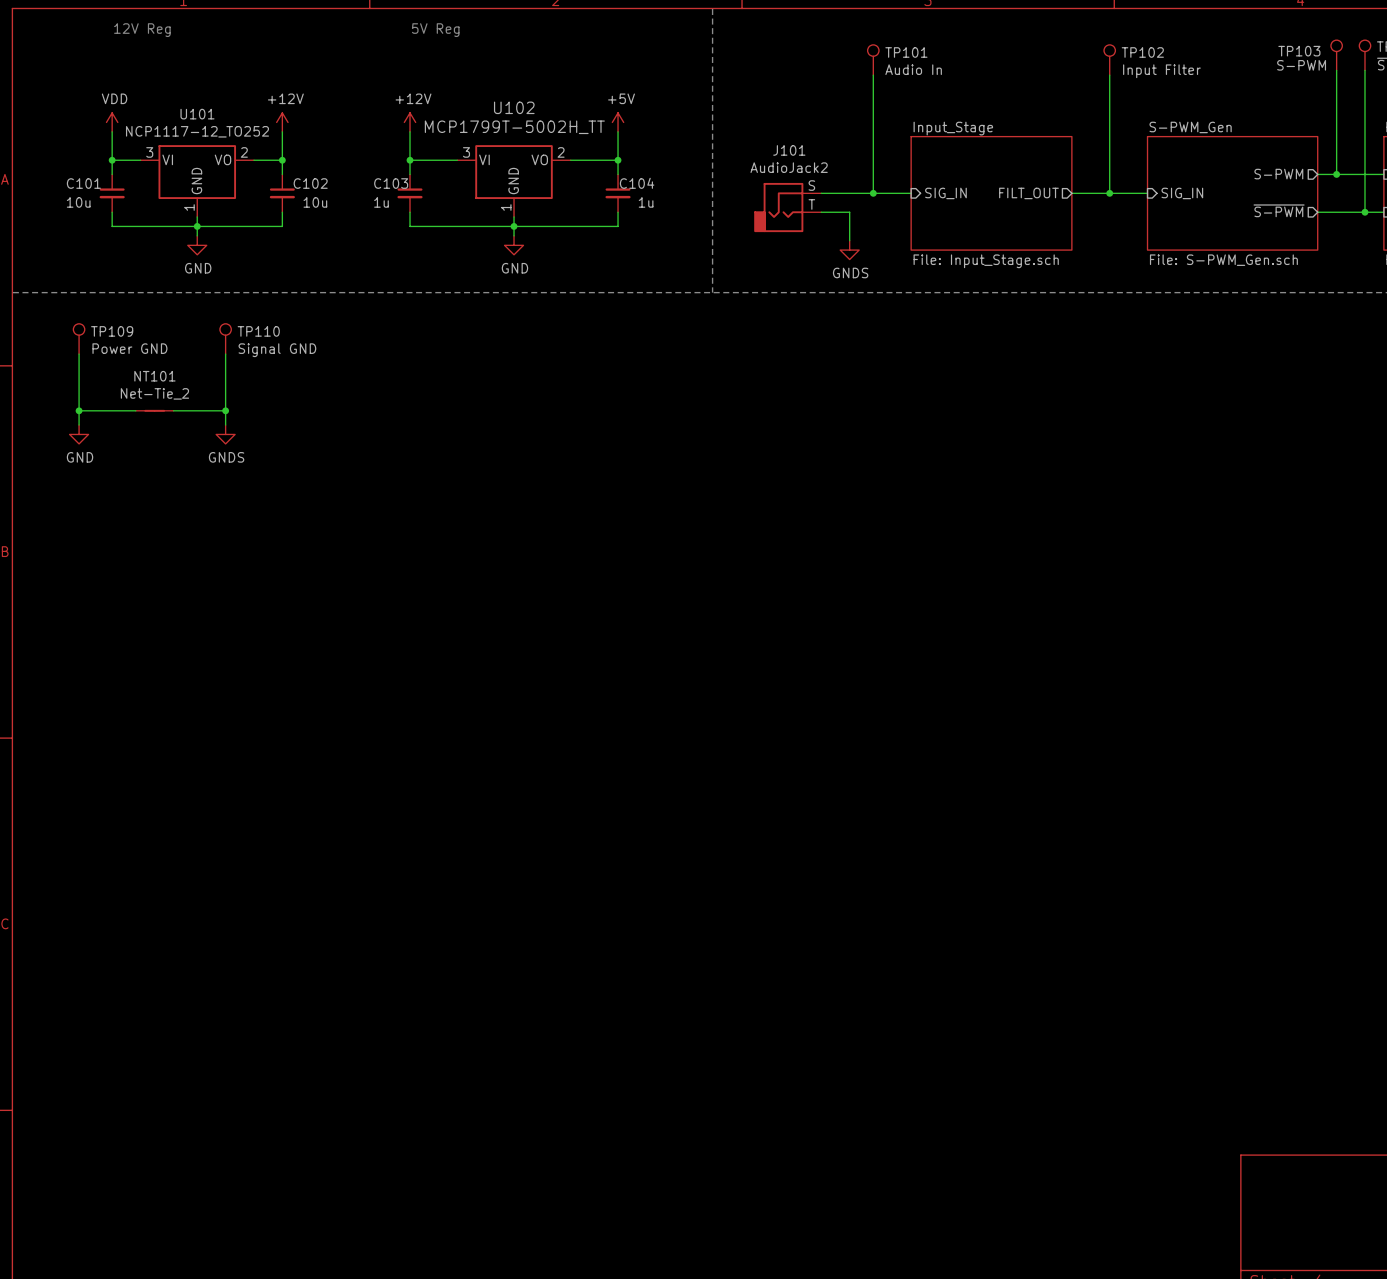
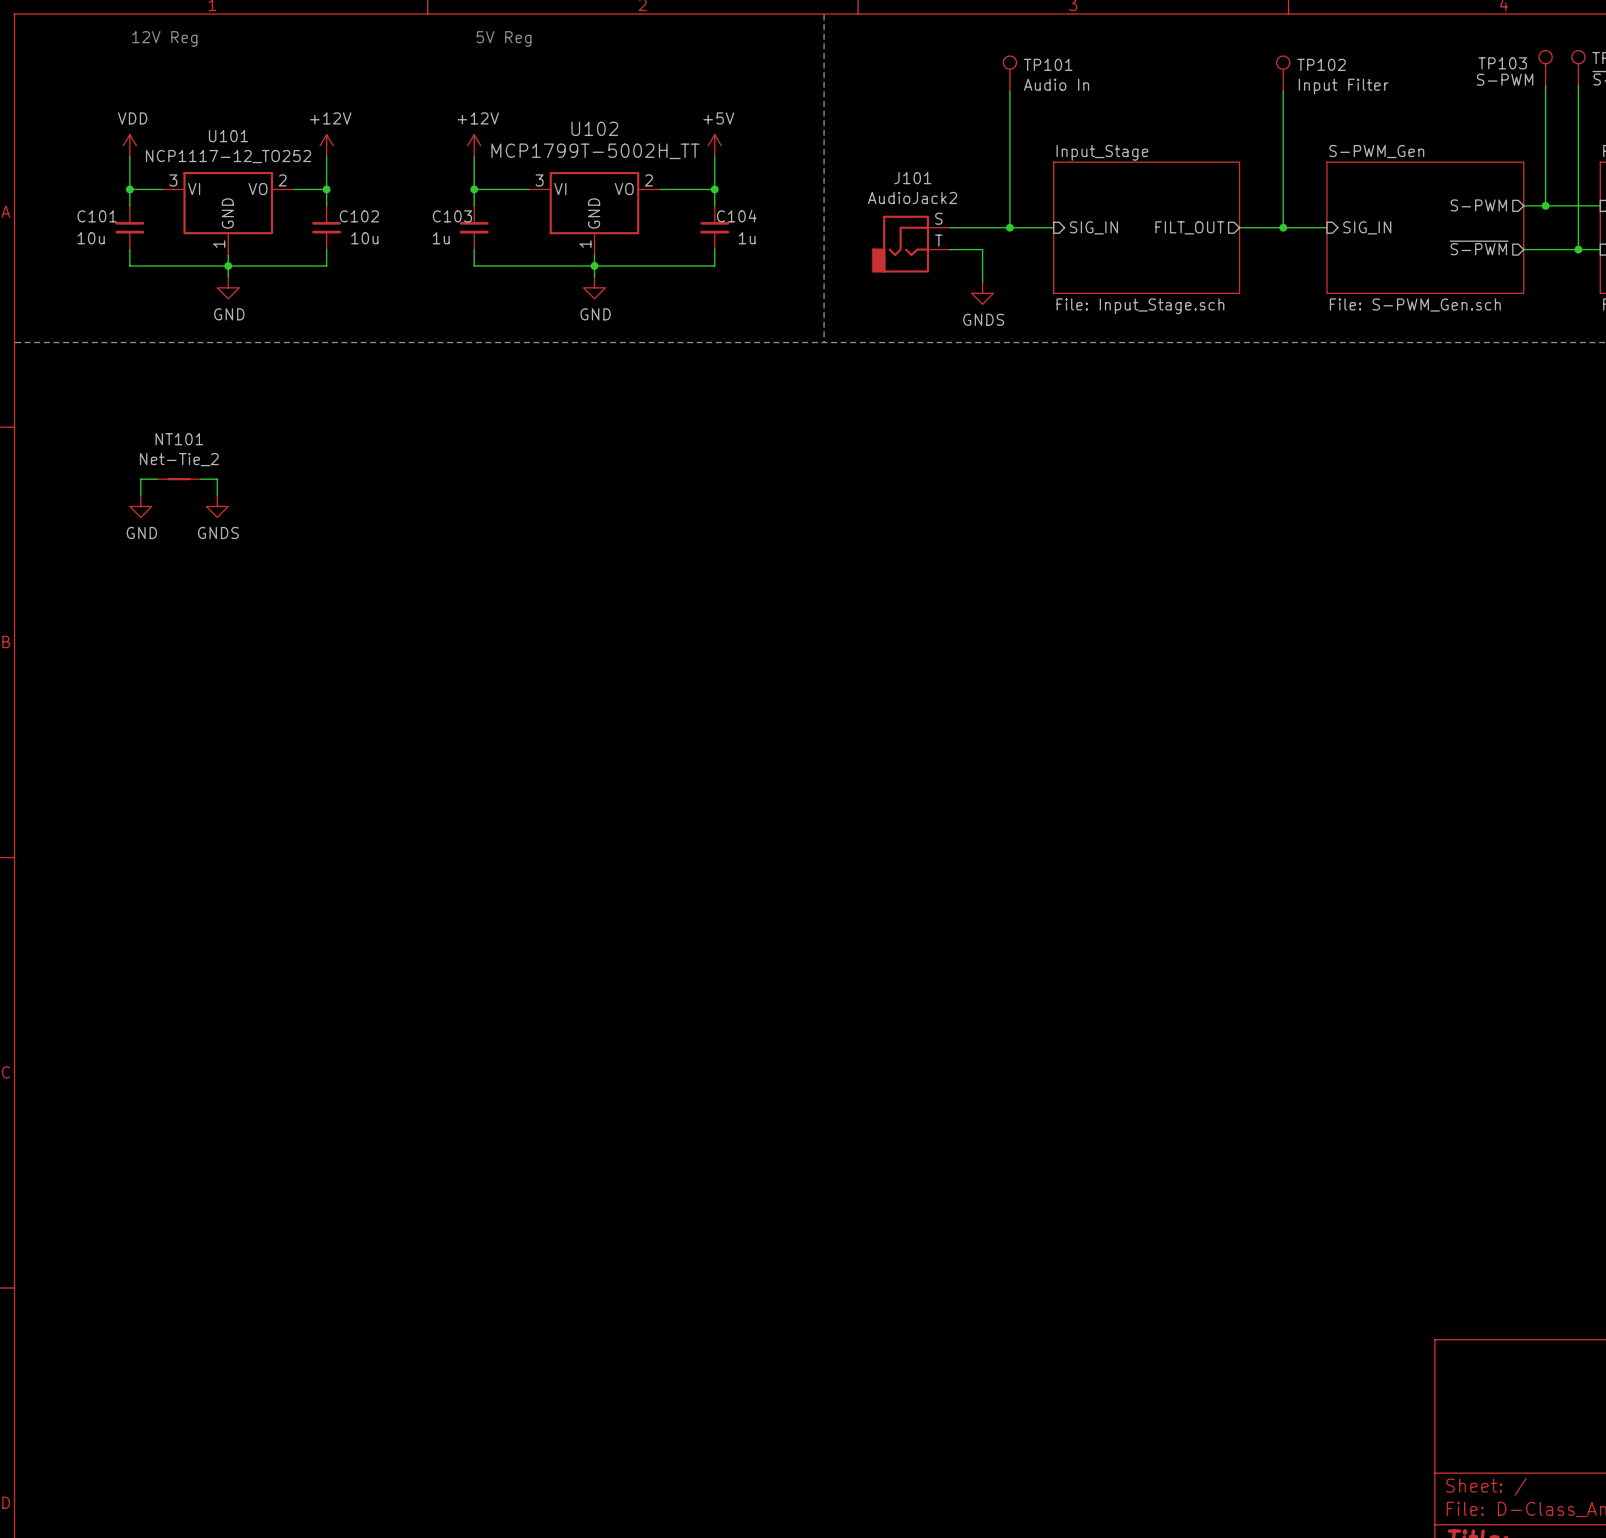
TP109: Power GND (79, 338) -> none
TP110: Signal GND (225, 338) -> none
wire: (79, 354) (79, 425) -> none
wire: (225, 354) (225, 425) -> none
wire: (79, 410) (121, 410) -> (140, 495) (140, 479)
junction: (79, 410) -> none
wire: (187, 410) (225, 410) -> (217, 479) (217, 495)
junction: (225, 410) -> none
power symbol position: GND (79, 434) -> GND (140, 506)
power symbol position: GNDS (225, 434) -> GNDS (217, 506)

